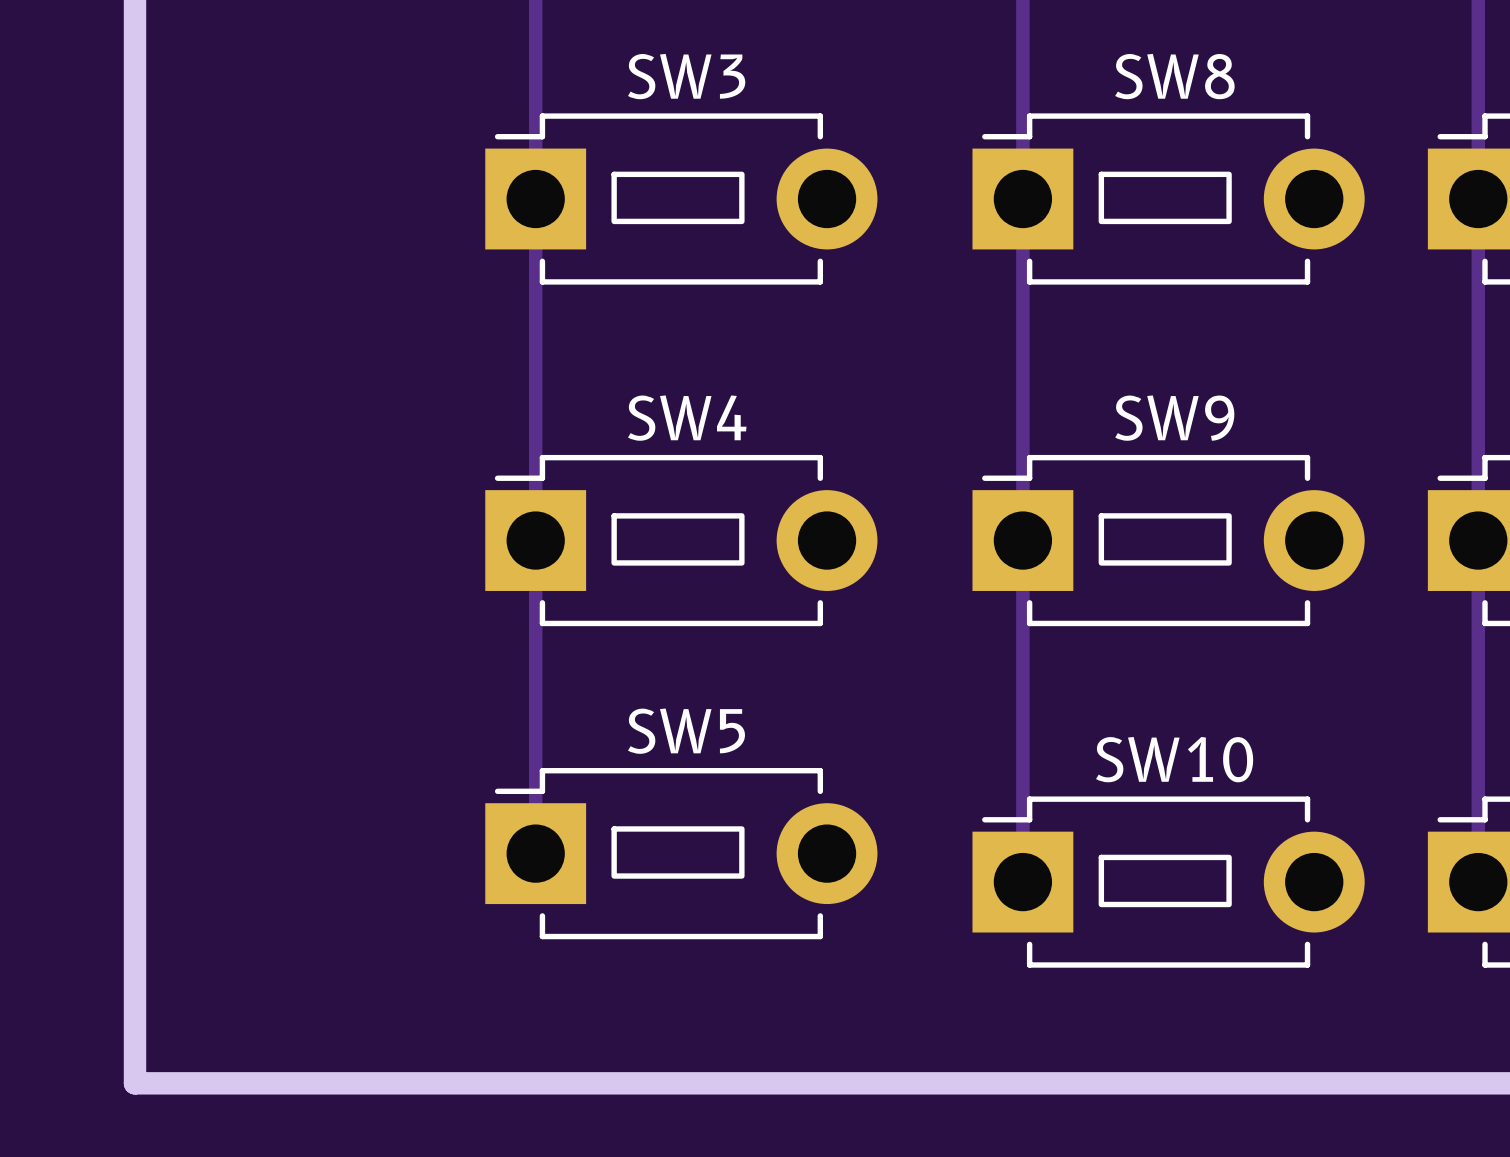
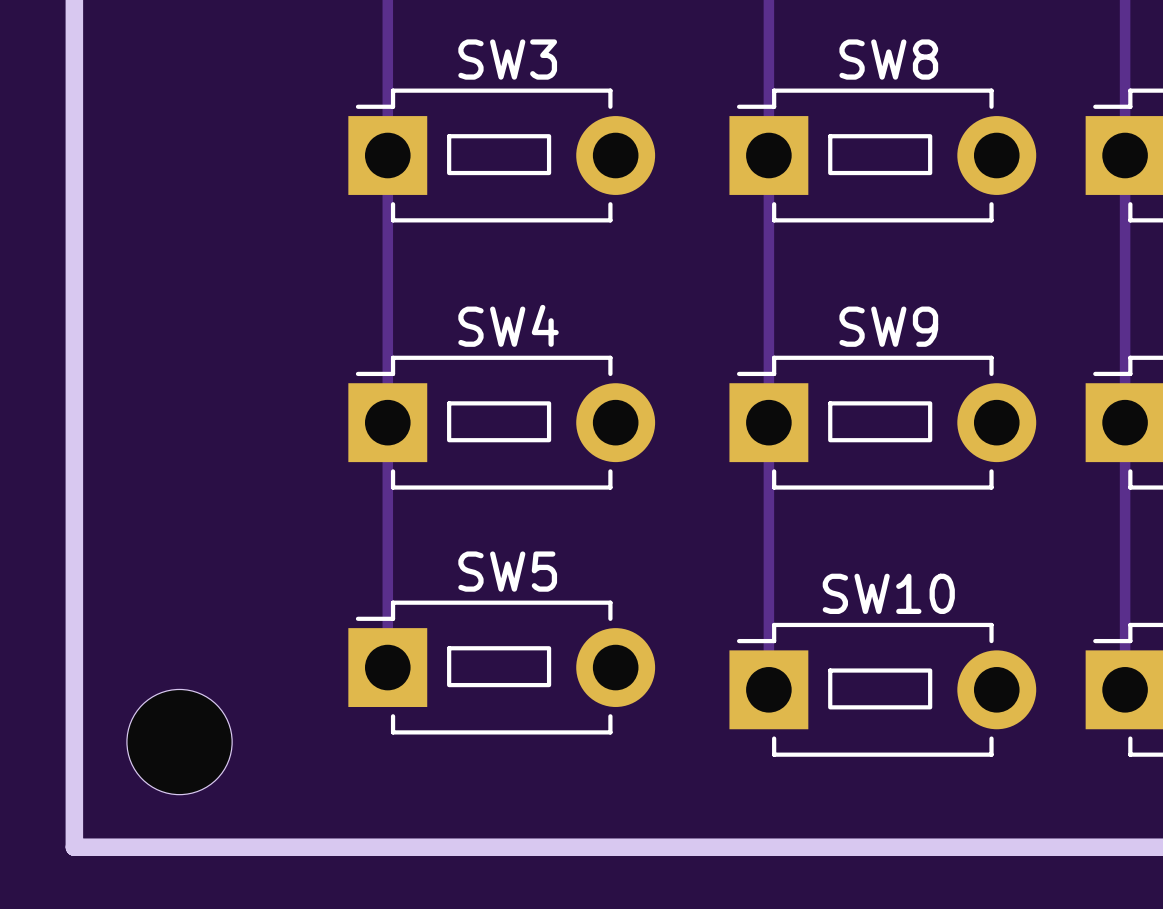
part: none -> (179, 742)

